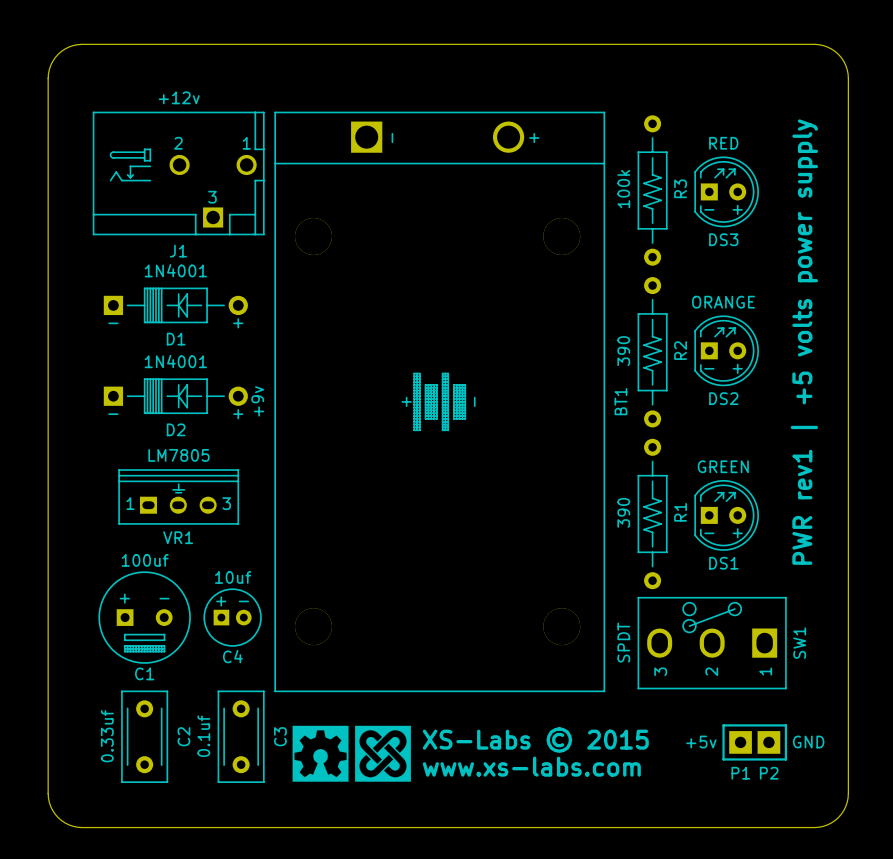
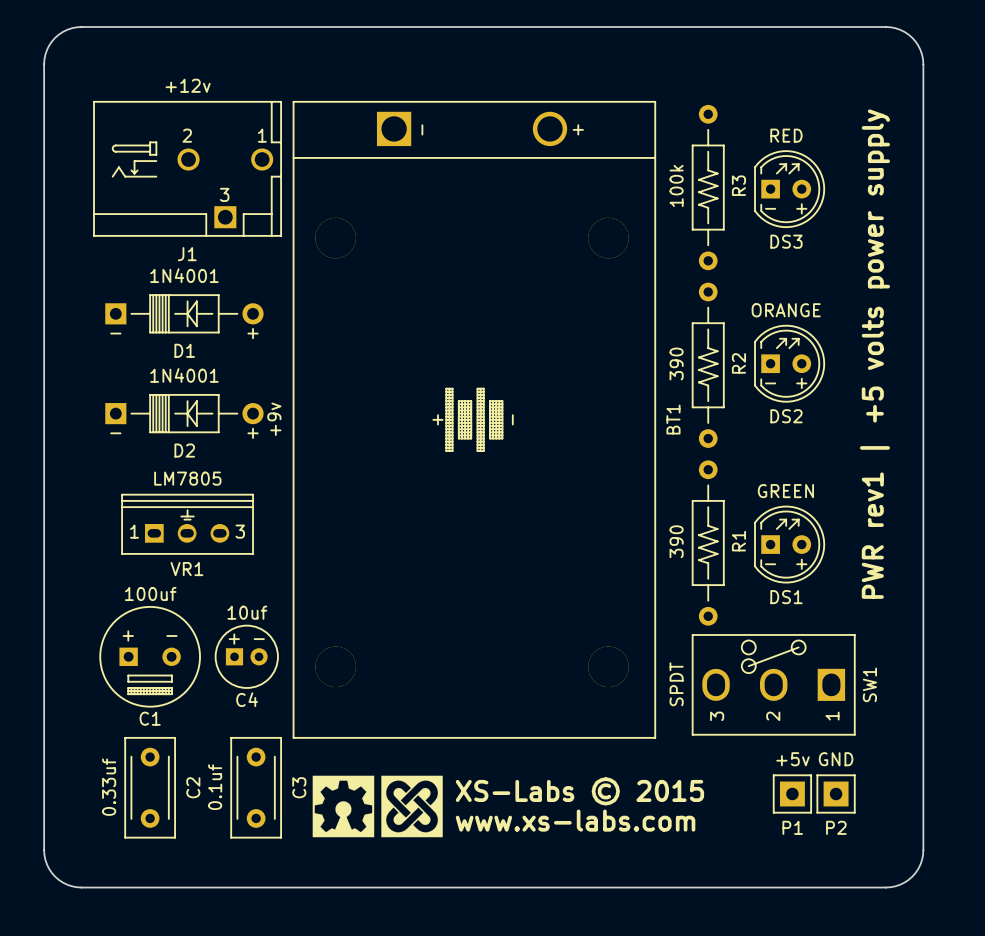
line: (723, 725) (723, 759) (785, 759) (785, 725) (723, 725) -> none
P1 footprint: [729, 731, 752, 754] -> [772, 774, 813, 814]
P2 footprint: [757, 731, 781, 754] -> [816, 774, 856, 814]
P1 value position: +5v (701, 742) -> +5v (793, 759)
P2 value position: GND (808, 742) -> GND (836, 759)

